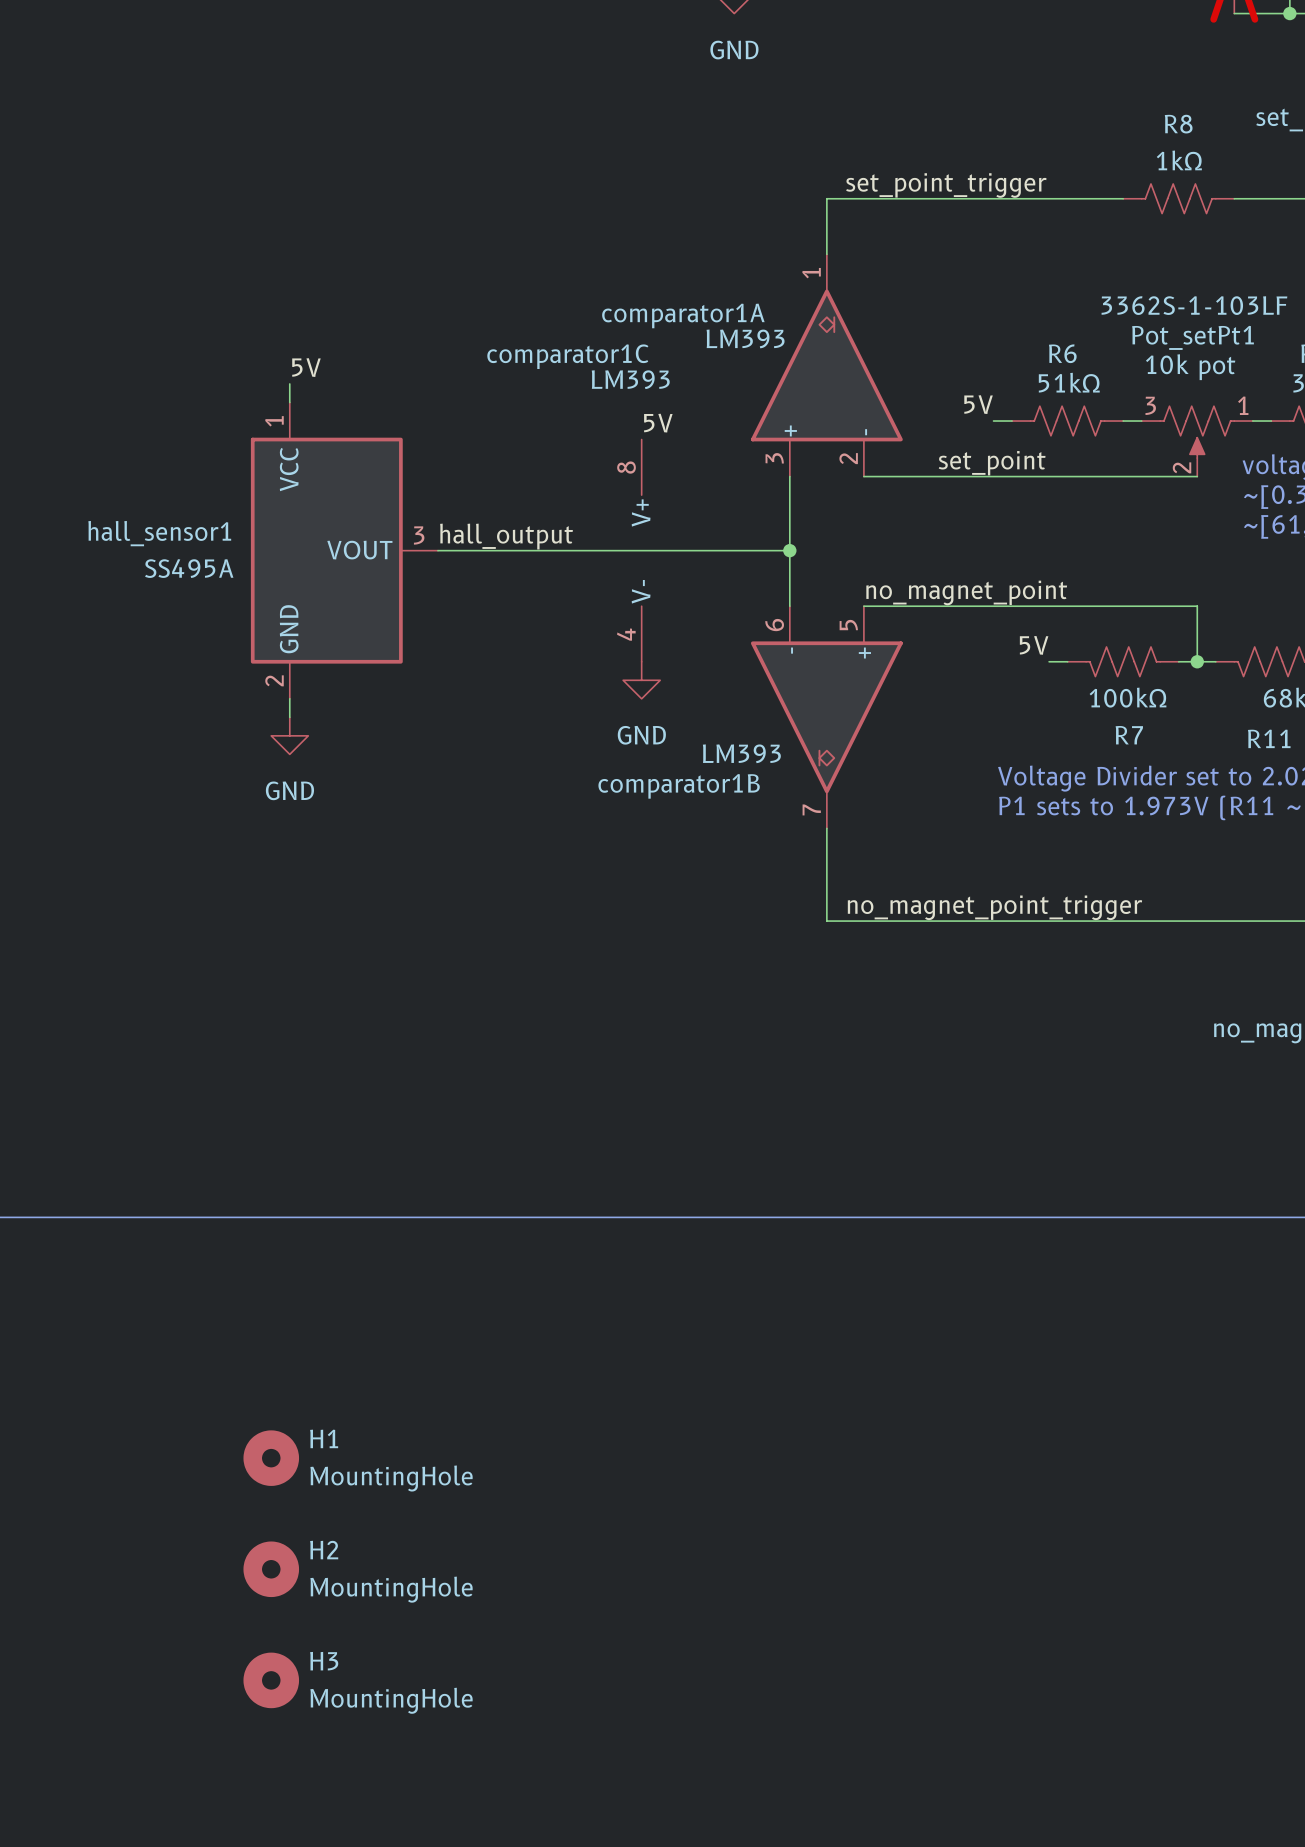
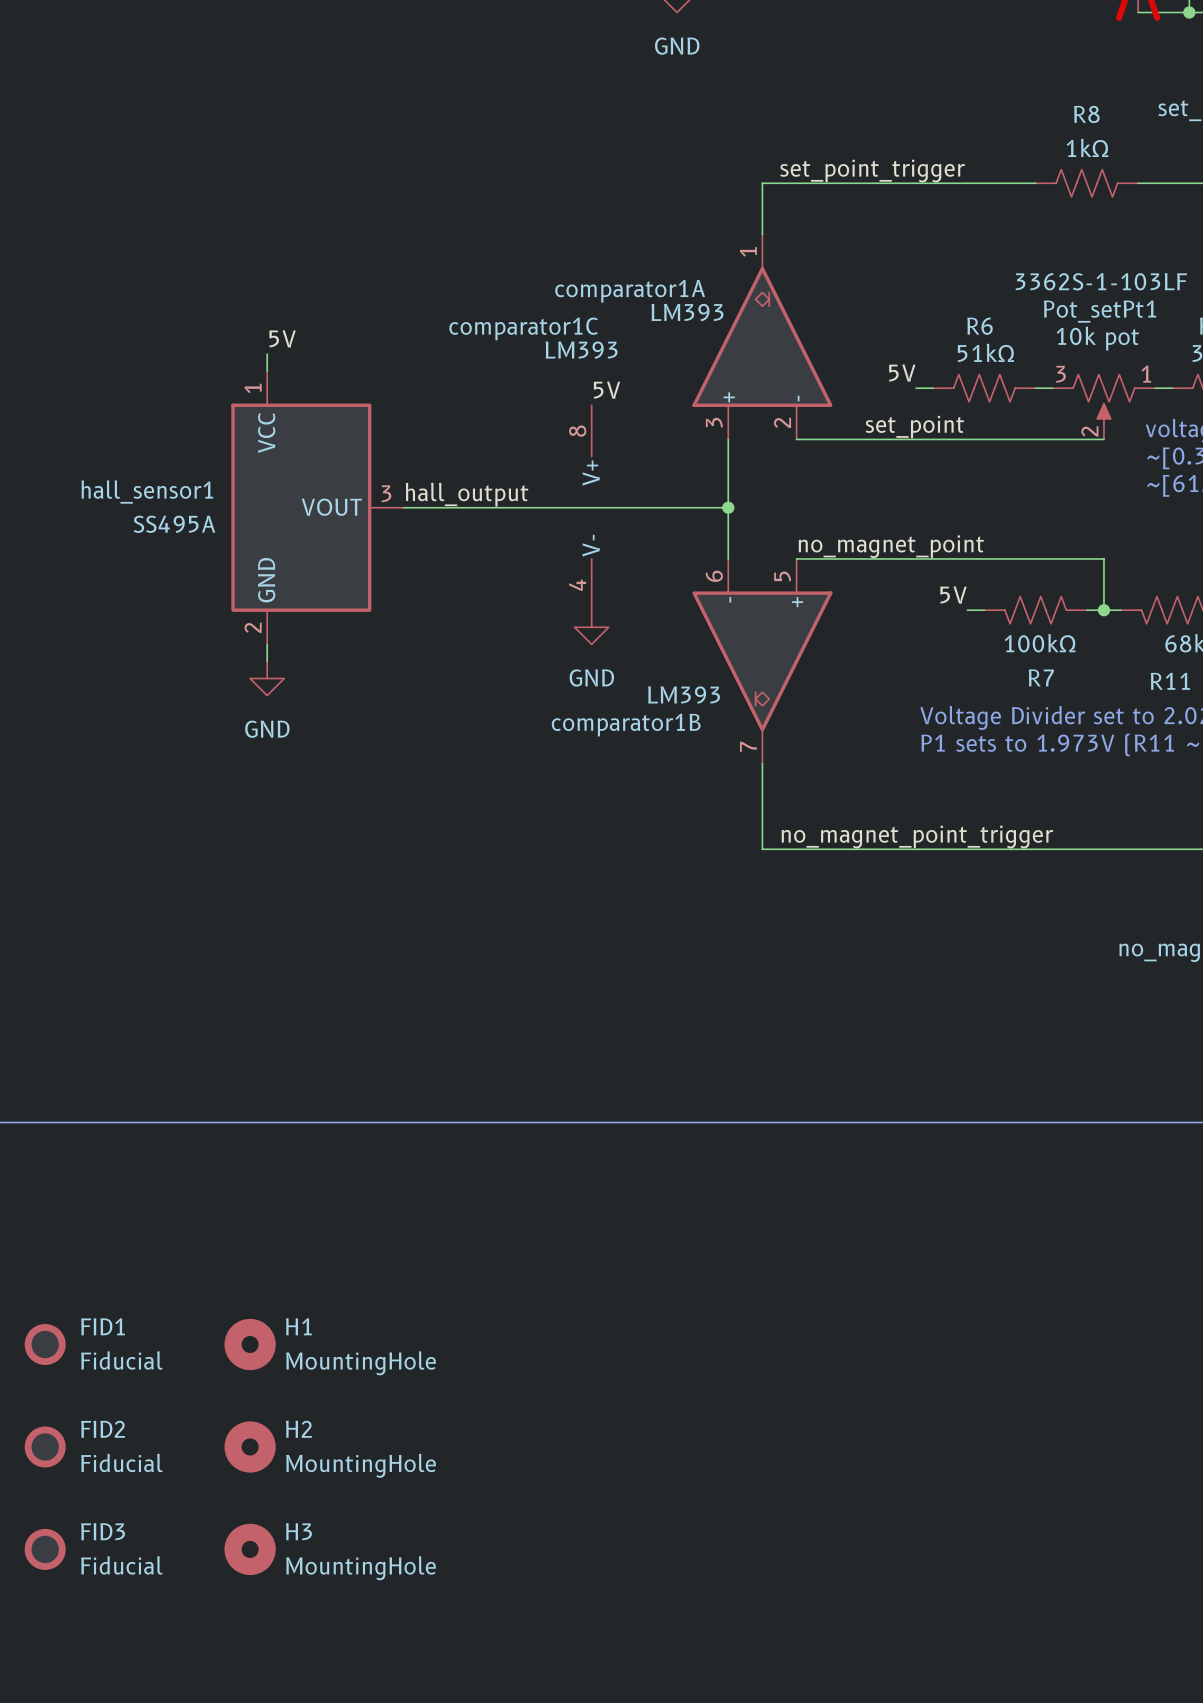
FID1: none -> Fiducial (45, 1344)
FID2: none -> Fiducial (45, 1446)
FID3: none -> Fiducial (45, 1549)

